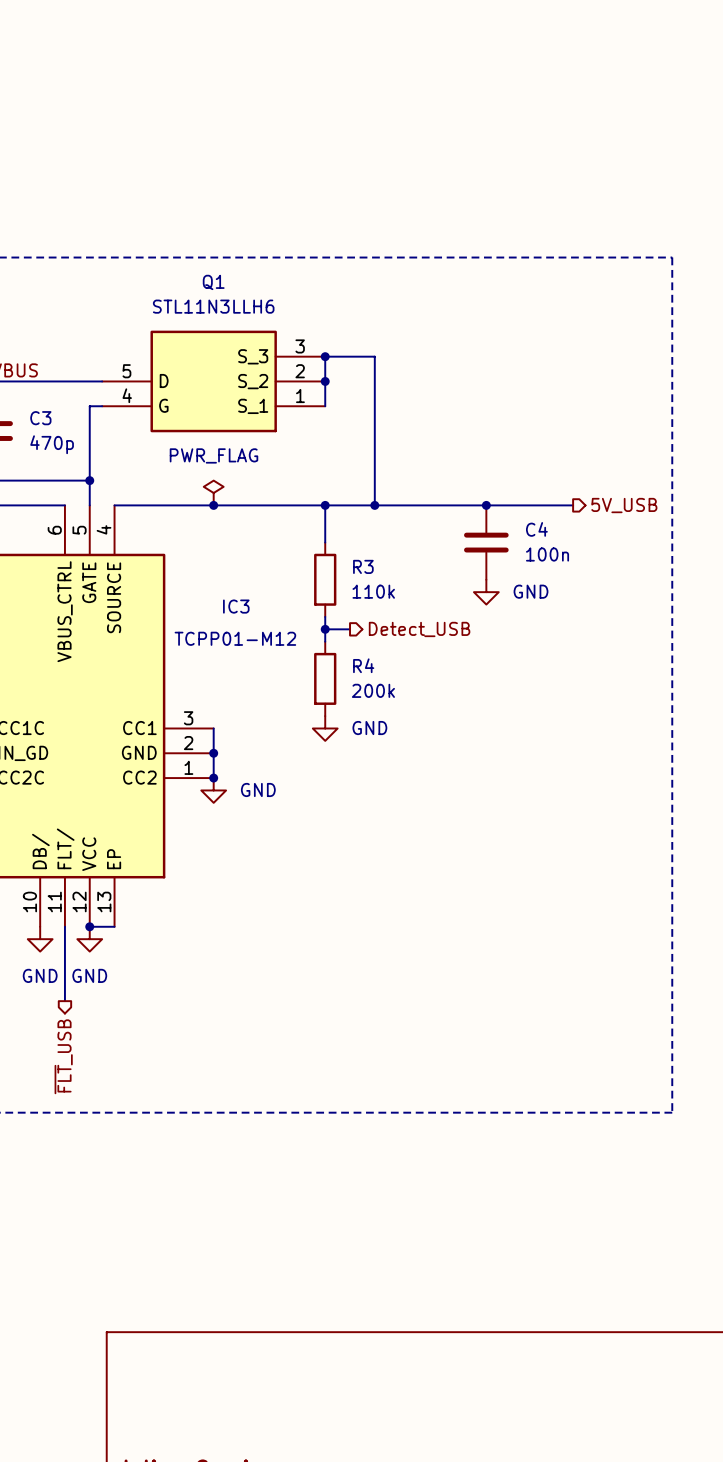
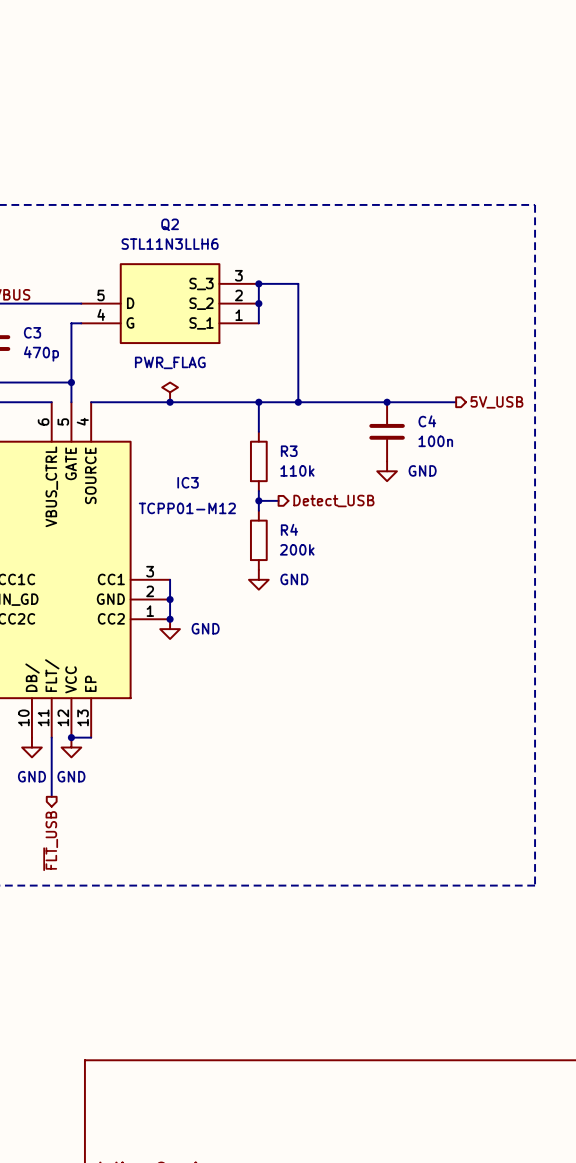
Q1 name: Q1 (213, 282) -> Q2 (170, 224)

